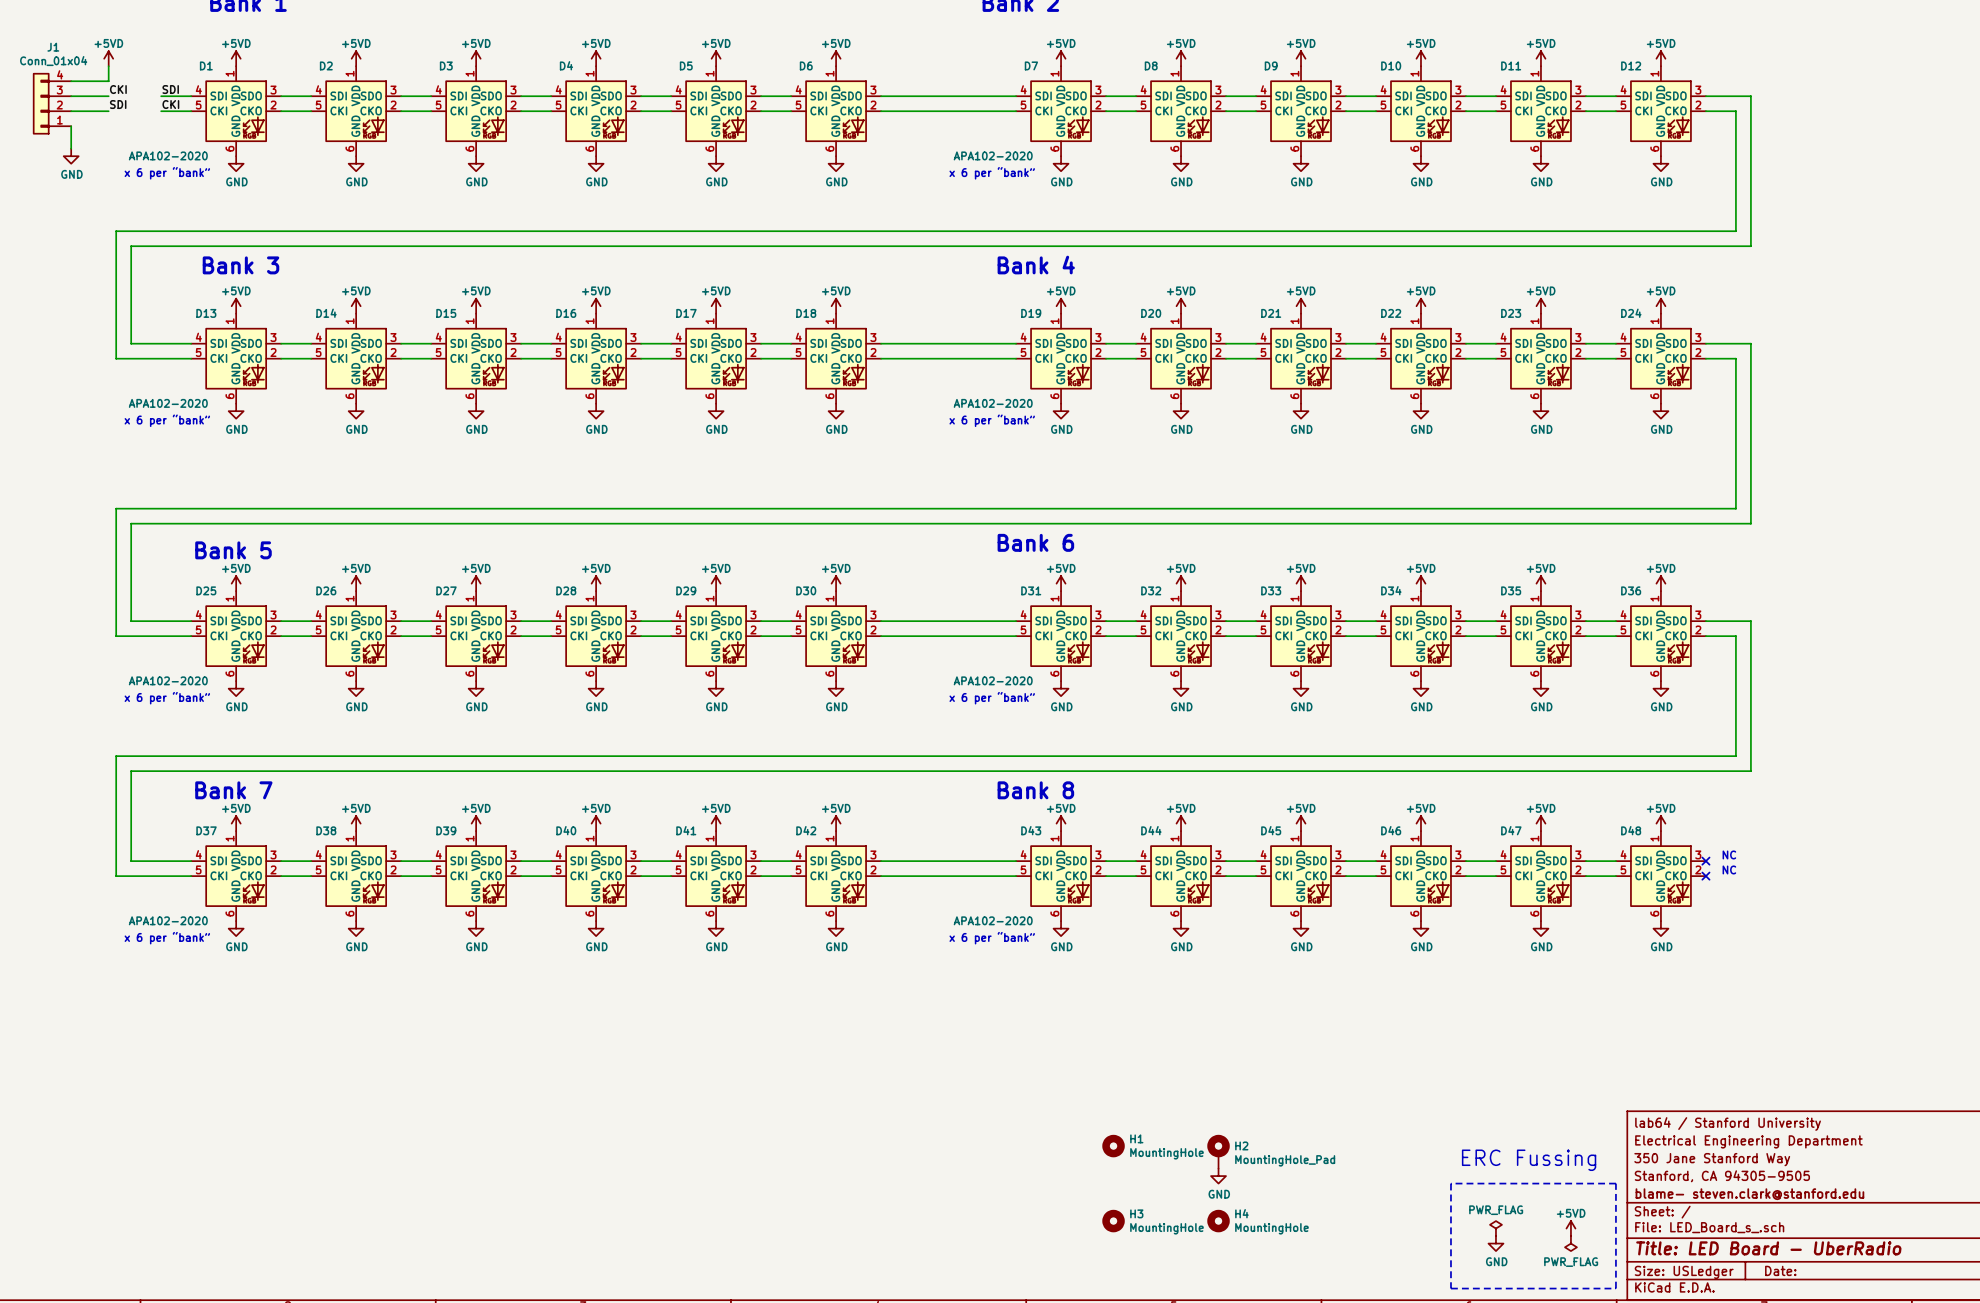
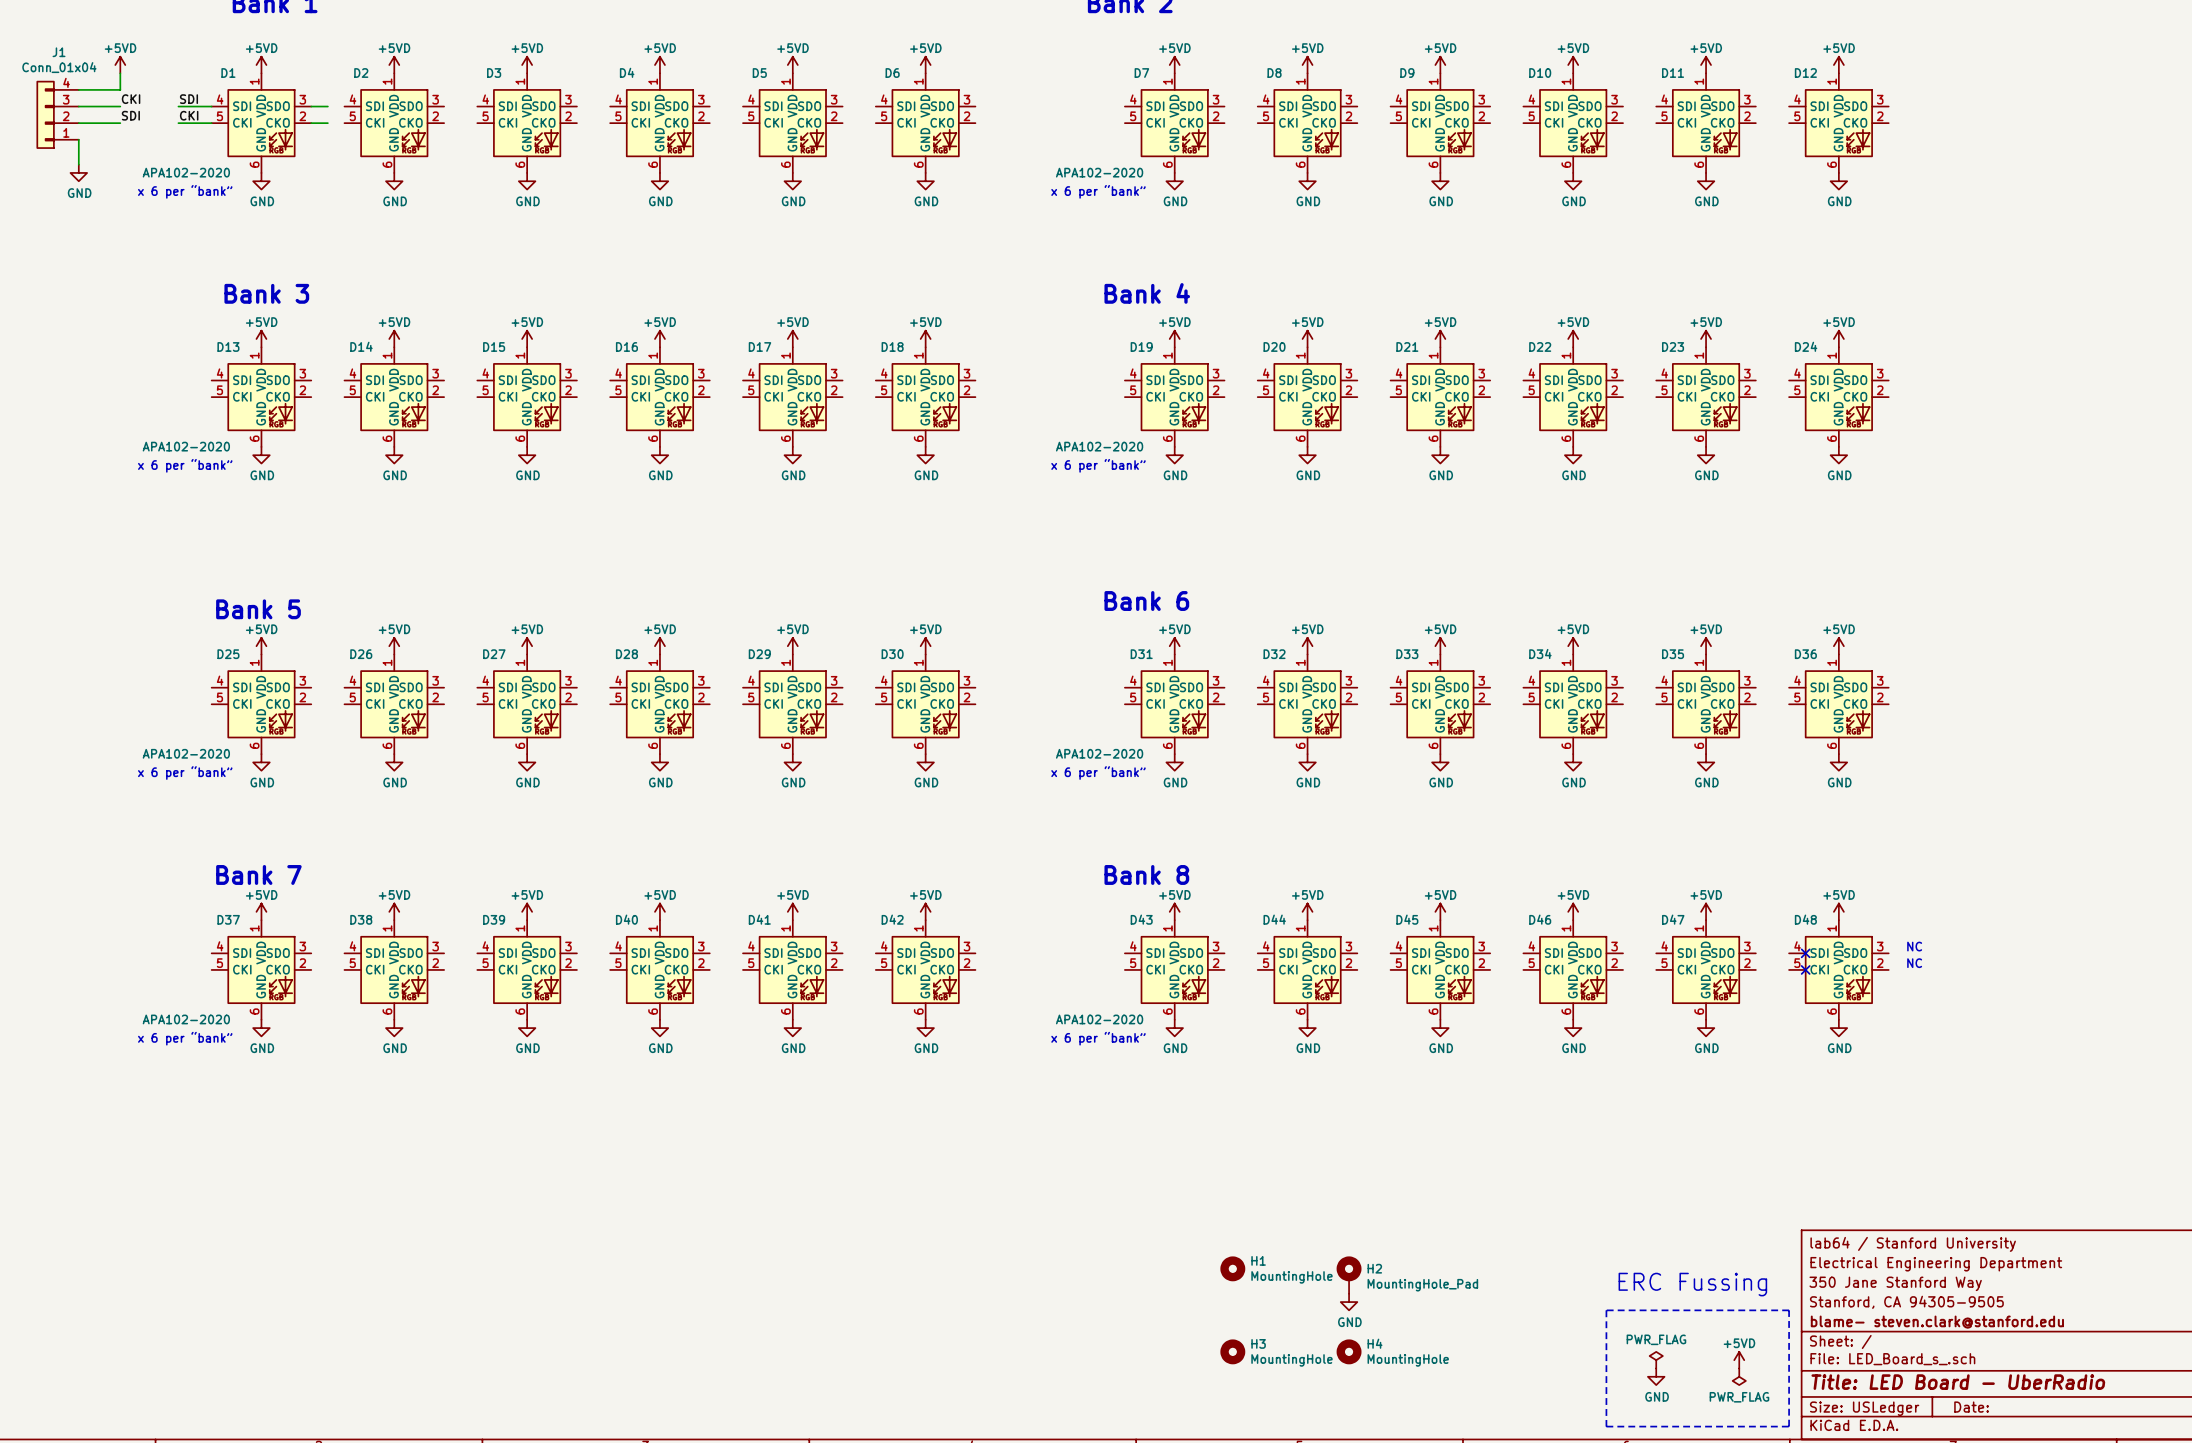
wire: (296, 96) (311, 96) -> none
wire: (401, 96) (431, 96) -> none
wire: (521, 96) (551, 96) -> none
wire: (641, 96) (671, 96) -> none
wire: (761, 96) (791, 96) -> none
wire: (881, 96) (1016, 96) -> none
wire: (1106, 96) (1136, 96) -> none
wire: (1226, 96) (1256, 96) -> none
wire: (1346, 96) (1375, 96) -> none
wire: (1465, 96) (1495, 96) -> none
wire: (1585, 96) (1615, 96) -> none
wire: (1705, 96) (1750, 96) (1750, 246) (131, 246) (131, 343) (191, 343) -> none
wire: (296, 111) (311, 111) -> none
wire: (401, 111) (431, 111) -> none
wire: (521, 111) (551, 111) -> none
wire: (641, 111) (671, 111) -> none
wire: (761, 111) (791, 111) -> none
wire: (881, 111) (1016, 111) -> none
wire: (1106, 111) (1136, 111) -> none
wire: (1226, 111) (1256, 111) -> none
wire: (1346, 111) (1375, 111) -> none
wire: (1465, 111) (1495, 111) -> none
wire: (1585, 111) (1615, 111) -> none
wire: (1705, 111) (1735, 111) (1735, 231) (116, 231) (116, 358) (191, 358) -> none
wire: (281, 343) (311, 343) -> none
wire: (401, 343) (431, 343) -> none
wire: (521, 343) (551, 343) -> none
wire: (641, 343) (671, 343) -> none
wire: (761, 343) (791, 343) -> none
wire: (881, 343) (1016, 343) -> none
wire: (1106, 343) (1136, 343) -> none
wire: (1226, 343) (1256, 343) -> none
wire: (1346, 343) (1375, 343) -> none
wire: (1465, 343) (1495, 343) -> none
wire: (1585, 343) (1615, 343) -> none
wire: (1705, 343) (1750, 343) (1750, 523) (131, 523) (131, 621) (191, 621) -> none
wire: (281, 358) (311, 358) -> none
wire: (401, 358) (431, 358) -> none
wire: (521, 358) (551, 358) -> none
wire: (641, 358) (671, 358) -> none
wire: (761, 358) (791, 358) -> none
wire: (881, 358) (1016, 358) -> none
wire: (1106, 358) (1136, 358) -> none
wire: (1226, 358) (1256, 358) -> none
wire: (1346, 358) (1375, 358) -> none
wire: (1465, 358) (1495, 358) -> none
wire: (1585, 358) (1615, 358) -> none
wire: (1705, 358) (1735, 358) (1735, 508) (116, 508) (116, 636) (191, 636) -> none
wire: (281, 621) (311, 621) -> none
wire: (401, 621) (431, 621) -> none
wire: (521, 621) (551, 621) -> none
wire: (641, 621) (671, 621) -> none
wire: (761, 621) (791, 621) -> none
wire: (881, 621) (1016, 621) -> none
wire: (1106, 621) (1136, 621) -> none
wire: (1226, 621) (1256, 621) -> none
wire: (1346, 621) (1375, 621) -> none
wire: (1465, 621) (1495, 621) -> none
wire: (1585, 621) (1615, 621) -> none
wire: (1705, 621) (1750, 621) (1750, 771) (131, 771) (131, 861) (191, 861) -> none
wire: (281, 636) (311, 636) -> none
wire: (401, 636) (431, 636) -> none
wire: (521, 636) (551, 636) -> none
wire: (641, 636) (671, 636) -> none
wire: (761, 636) (791, 636) -> none
wire: (881, 636) (1016, 636) -> none
wire: (1106, 636) (1136, 636) -> none
wire: (1226, 636) (1256, 636) -> none
wire: (1346, 636) (1375, 636) -> none
wire: (1465, 636) (1495, 636) -> none
wire: (1585, 636) (1615, 636) -> none
wire: (1705, 636) (1735, 636) (1735, 756) (116, 756) (116, 876) (191, 876) -> none
wire: (281, 861) (311, 861) -> none
wire: (401, 861) (431, 861) -> none
wire: (521, 861) (551, 861) -> none
wire: (641, 861) (671, 861) -> none
wire: (761, 861) (791, 861) -> none
wire: (881, 861) (1016, 861) -> none
wire: (1106, 861) (1136, 861) -> none
wire: (1226, 861) (1256, 861) -> none
wire: (1346, 861) (1375, 861) -> none
wire: (1465, 861) (1495, 861) -> none
wire: (1585, 861) (1615, 861) -> none
no-connect mark: none -> (1805, 953)
no-connect mark: (1705, 861) -> none
wire: (281, 876) (311, 876) -> none
wire: (401, 876) (431, 876) -> none
wire: (521, 876) (551, 876) -> none
wire: (641, 876) (671, 876) -> none
wire: (761, 876) (791, 876) -> none
wire: (881, 876) (1016, 876) -> none
wire: (1106, 876) (1136, 876) -> none
wire: (1226, 876) (1256, 876) -> none
wire: (1346, 876) (1375, 876) -> none
wire: (1465, 876) (1495, 876) -> none
wire: (1585, 876) (1615, 876) -> none
no-connect mark: none -> (1805, 969)
no-connect mark: (1705, 876) -> none

